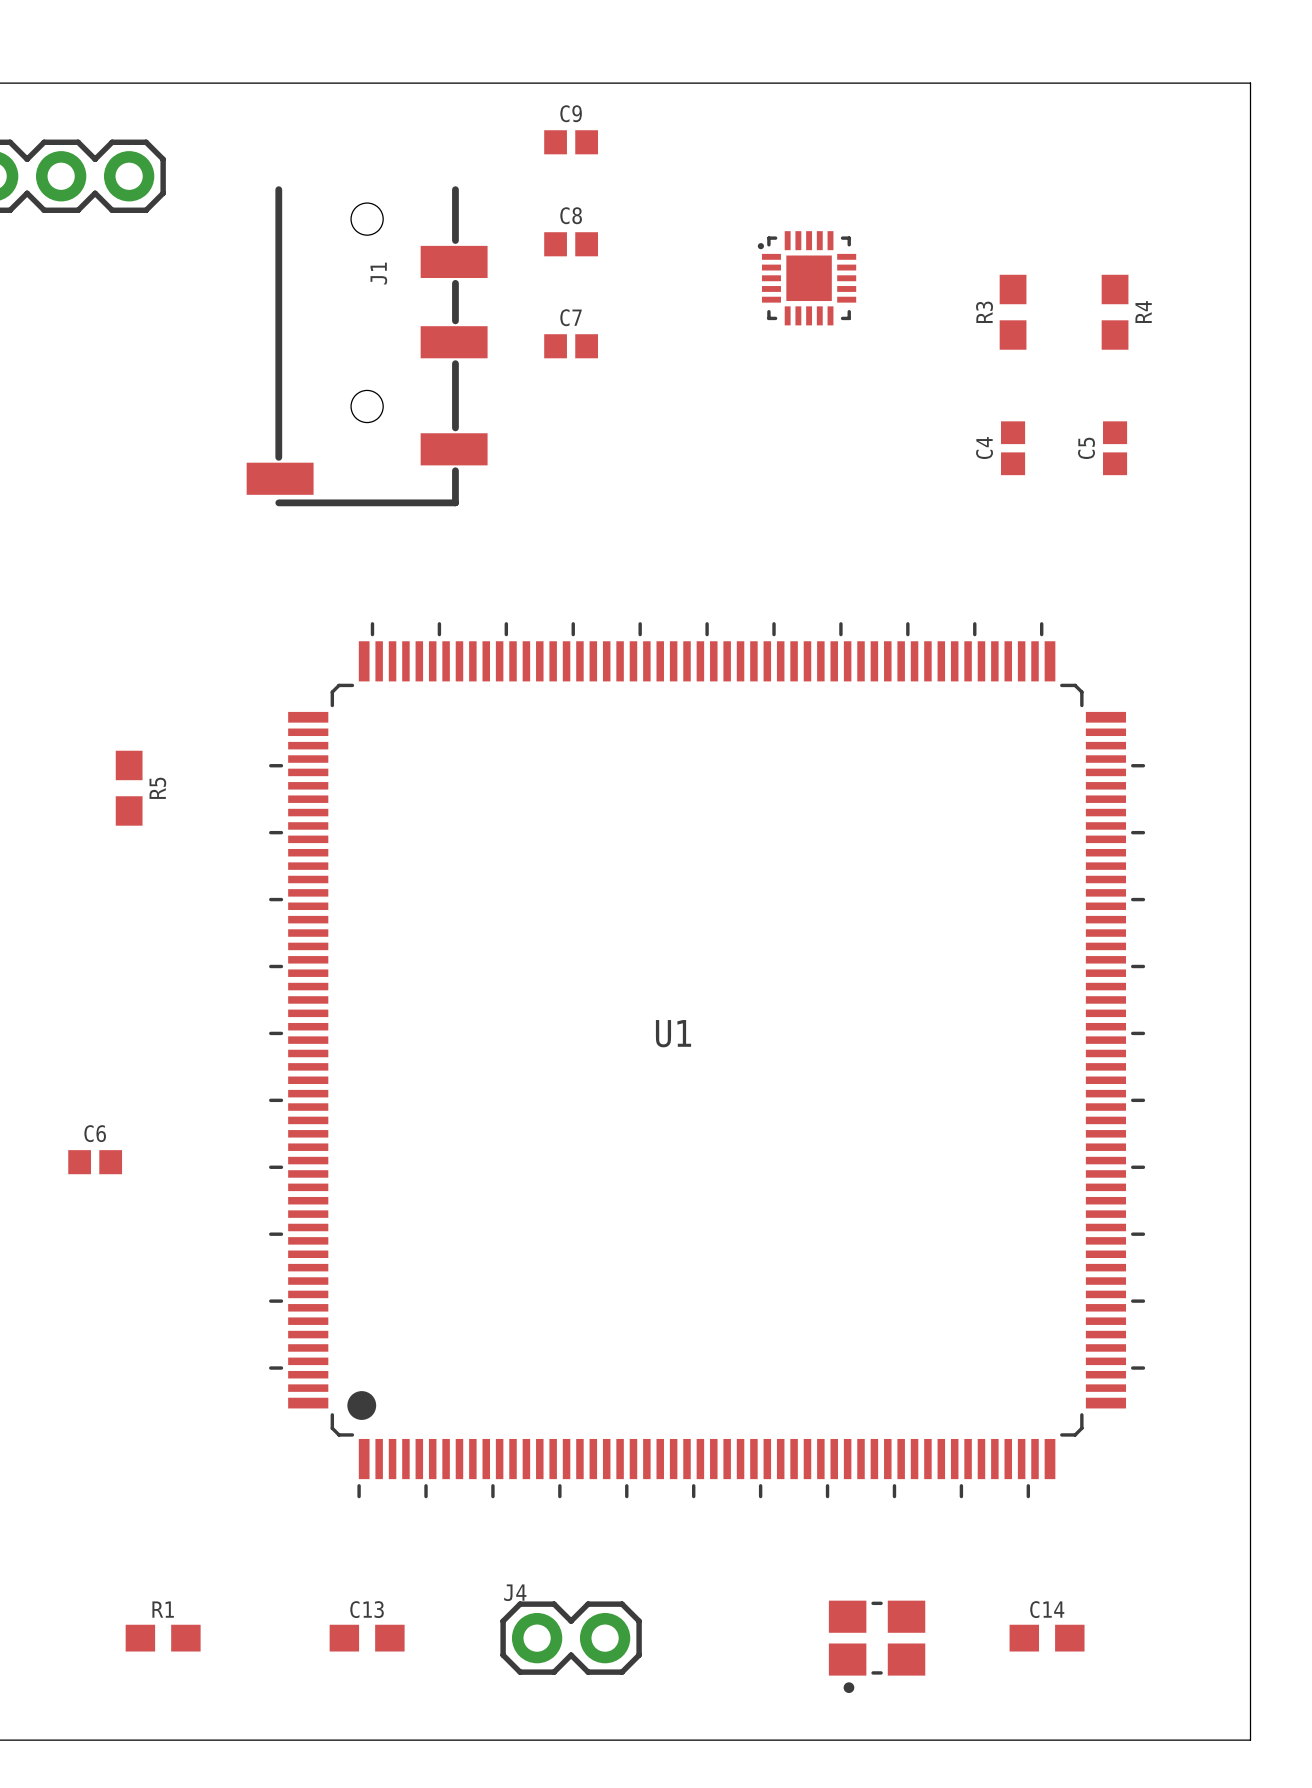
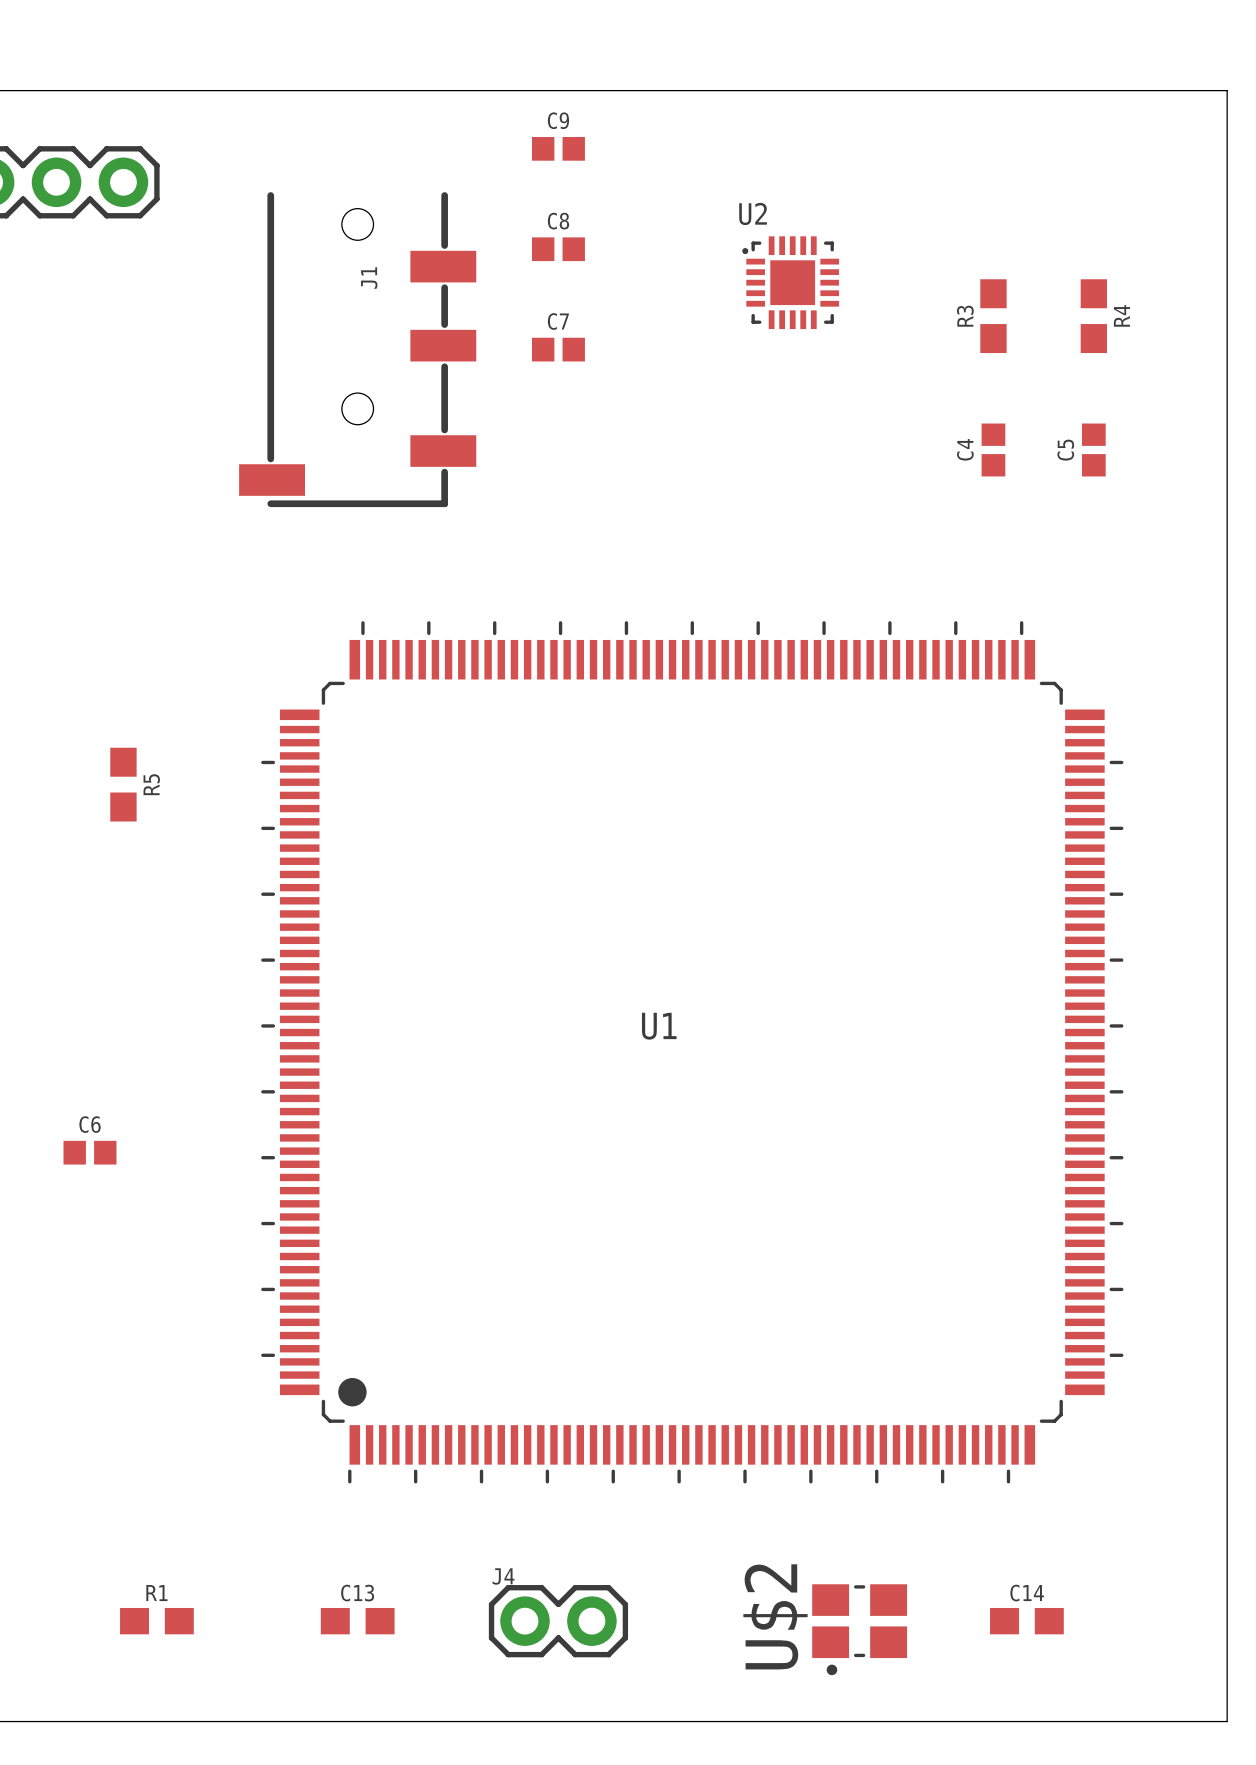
U2 name: none -> U2 (753, 213)
U$2 name: none -> U$2 (775, 1616)

